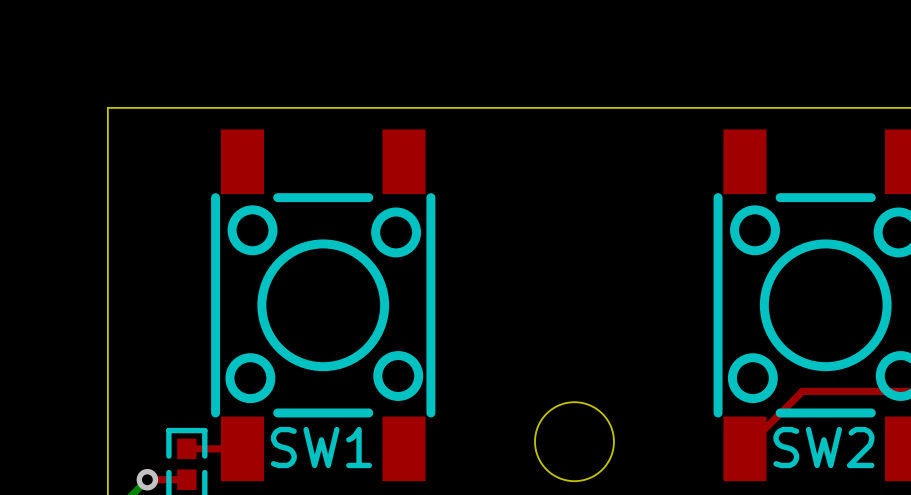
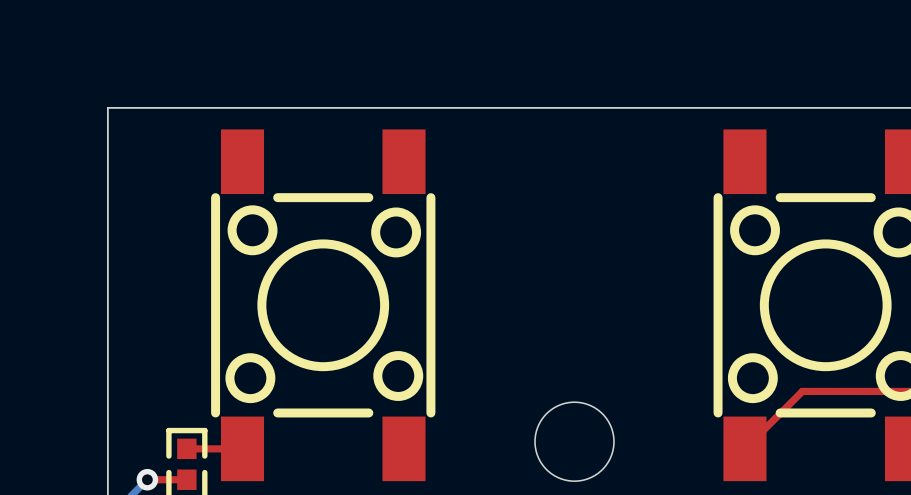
SW1 name: SW1 (321, 447) -> none
SW2 name: SW2 (823, 447) -> none

